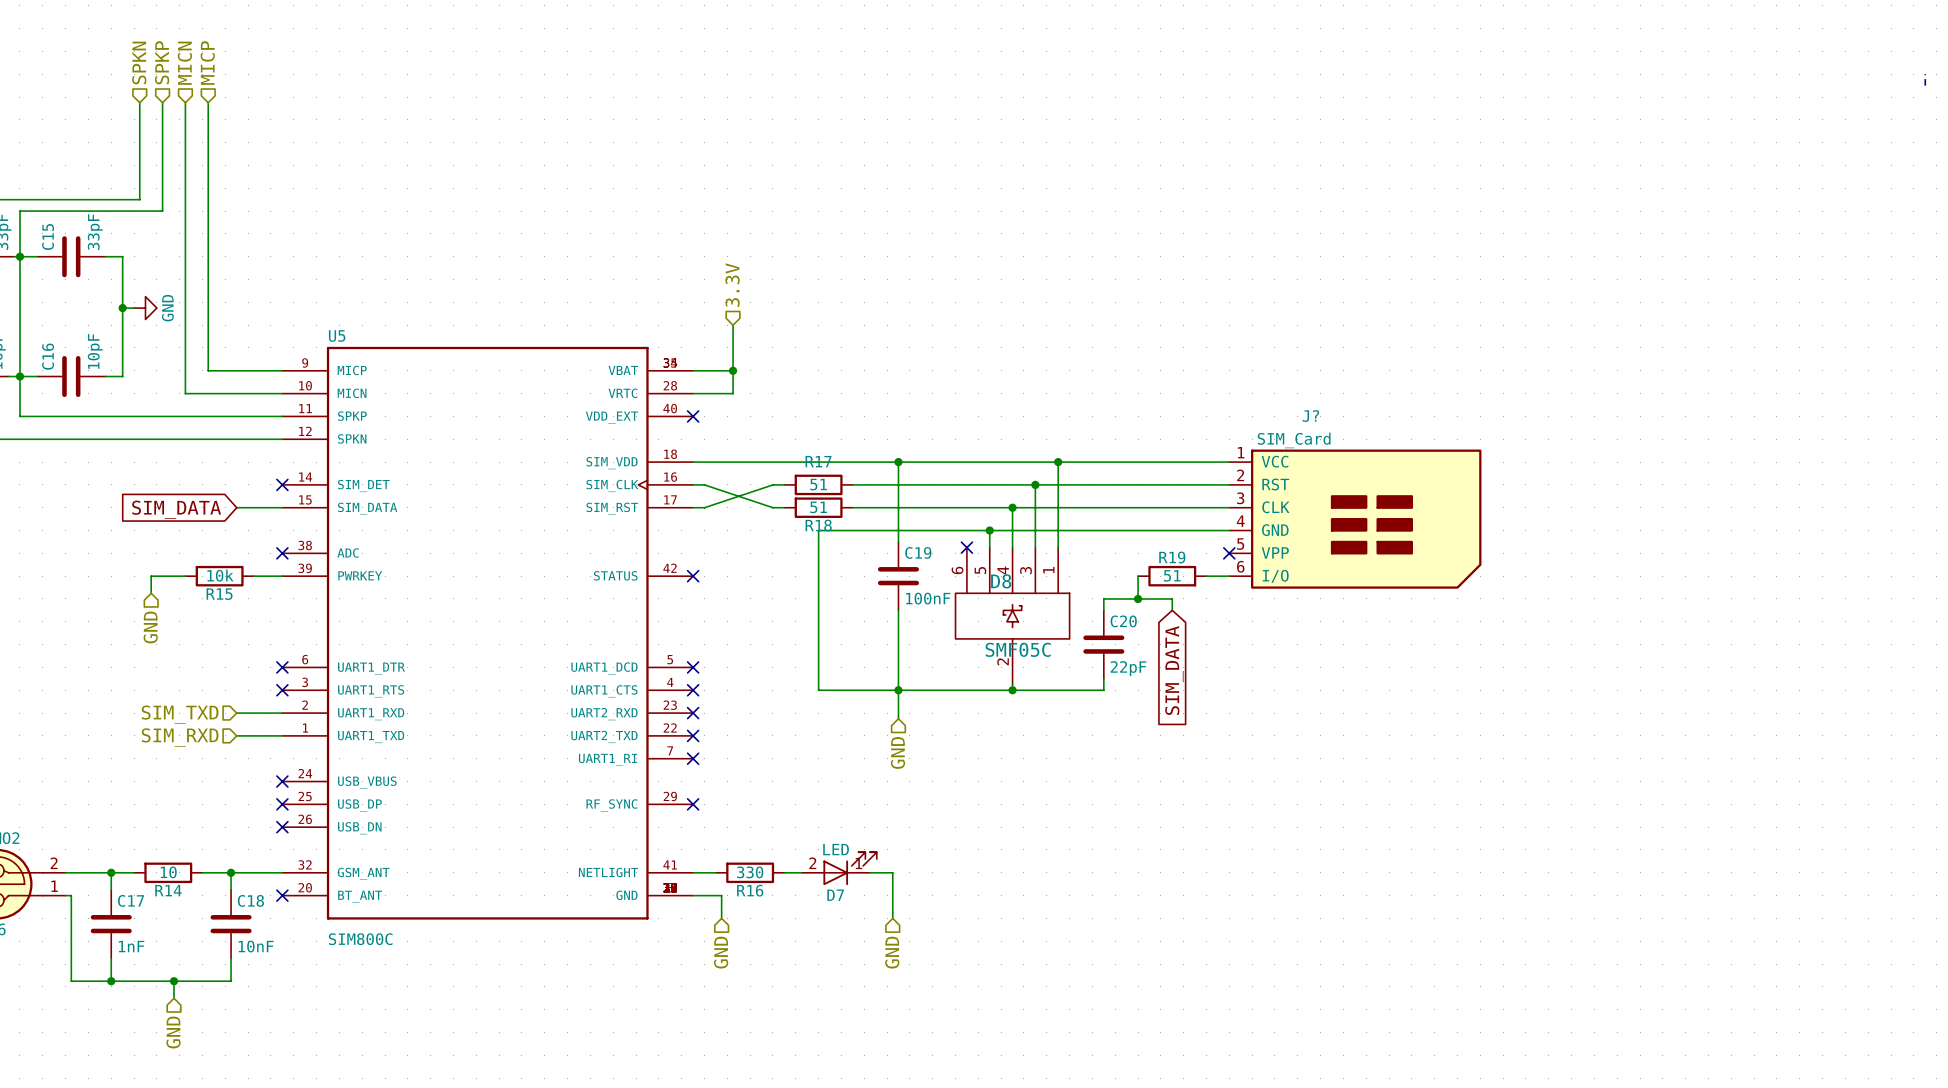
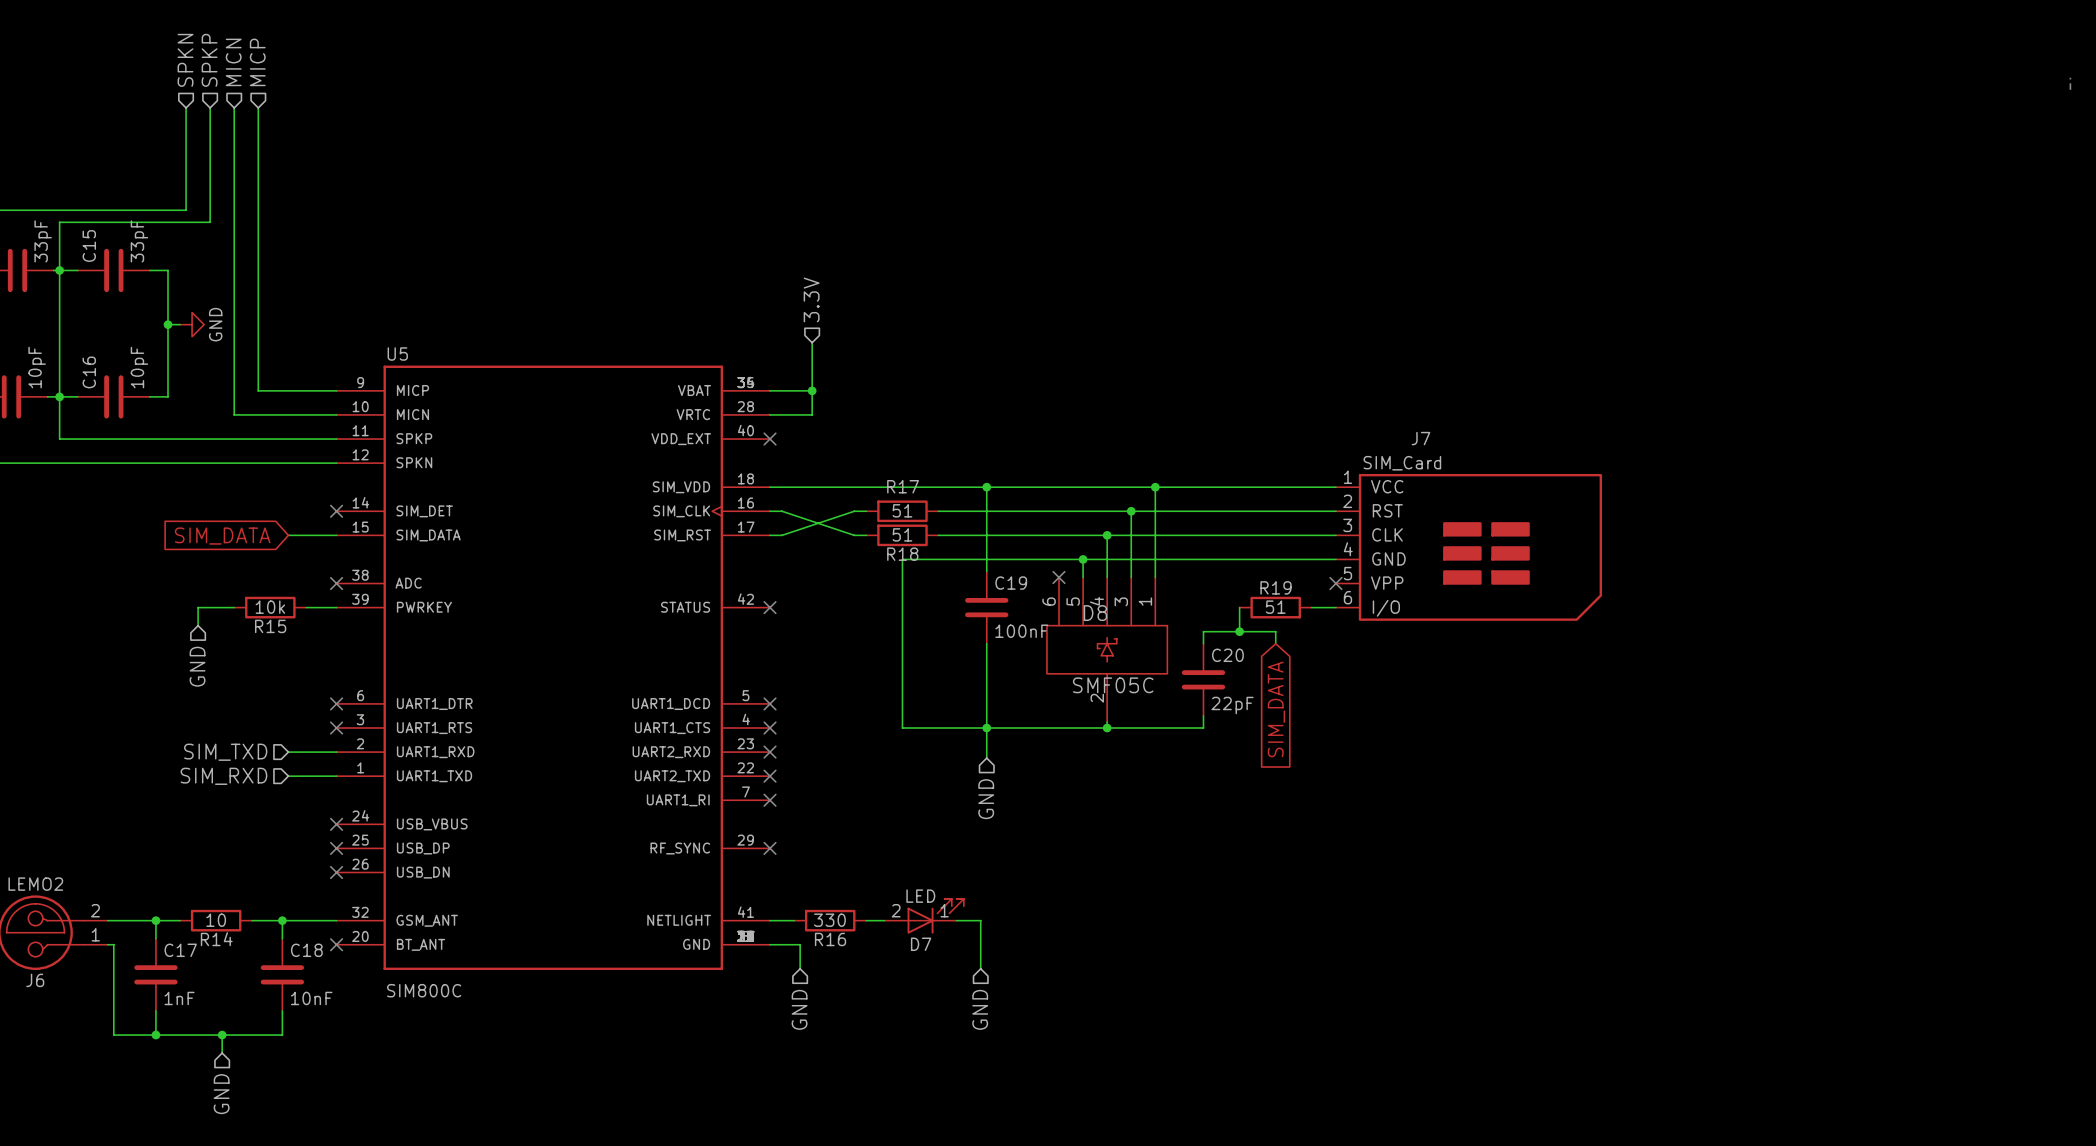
J? name: J? (1310, 416) -> J7 (1420, 438)

